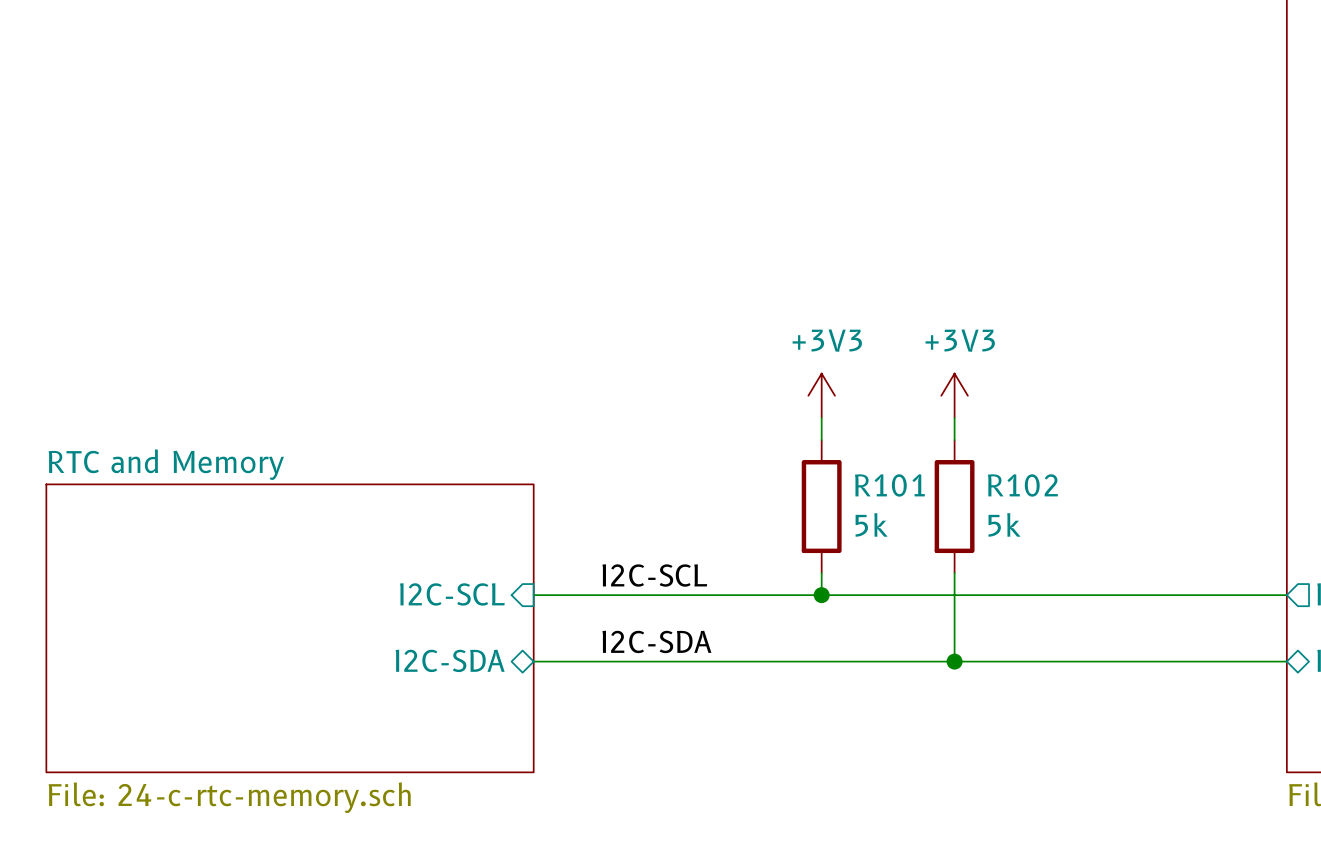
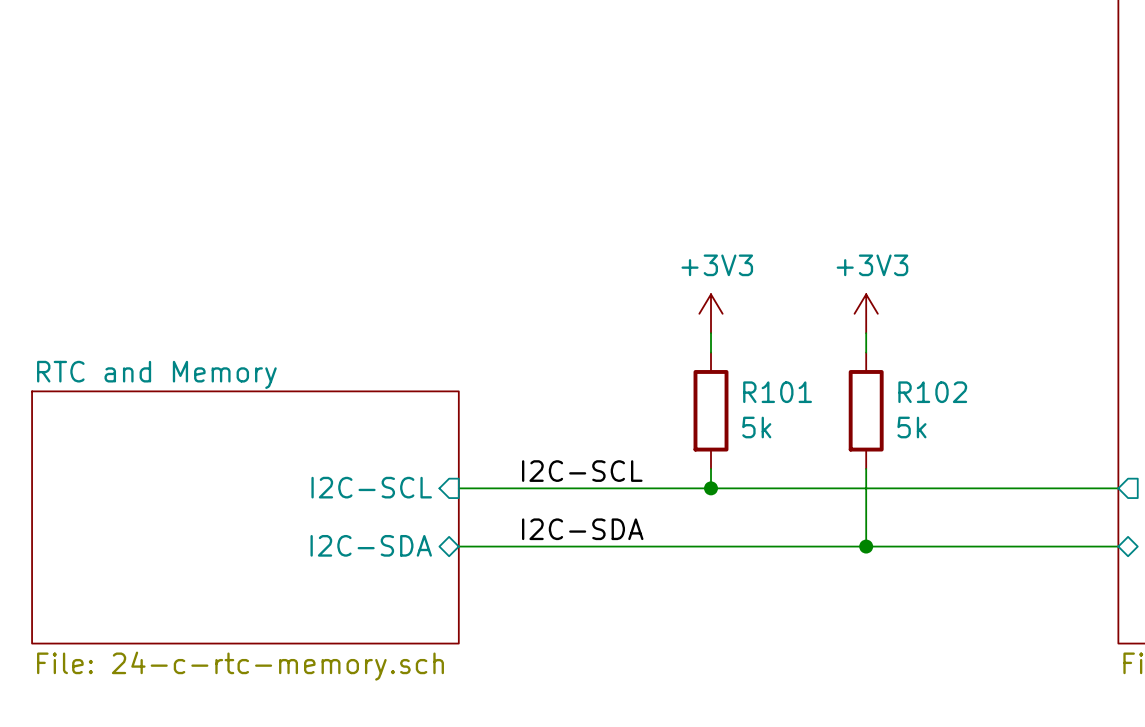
power symbol position: +3V3 (954, 395) -> +3V3 (866, 313)
wire: (954, 417) (954, 440) -> (866, 333) (866, 352)
R102 position: (954, 506) -> (866, 410)
wire: (954, 572) (954, 661) -> (866, 468) (866, 546)
junction position: (954, 661) -> (866, 546)

